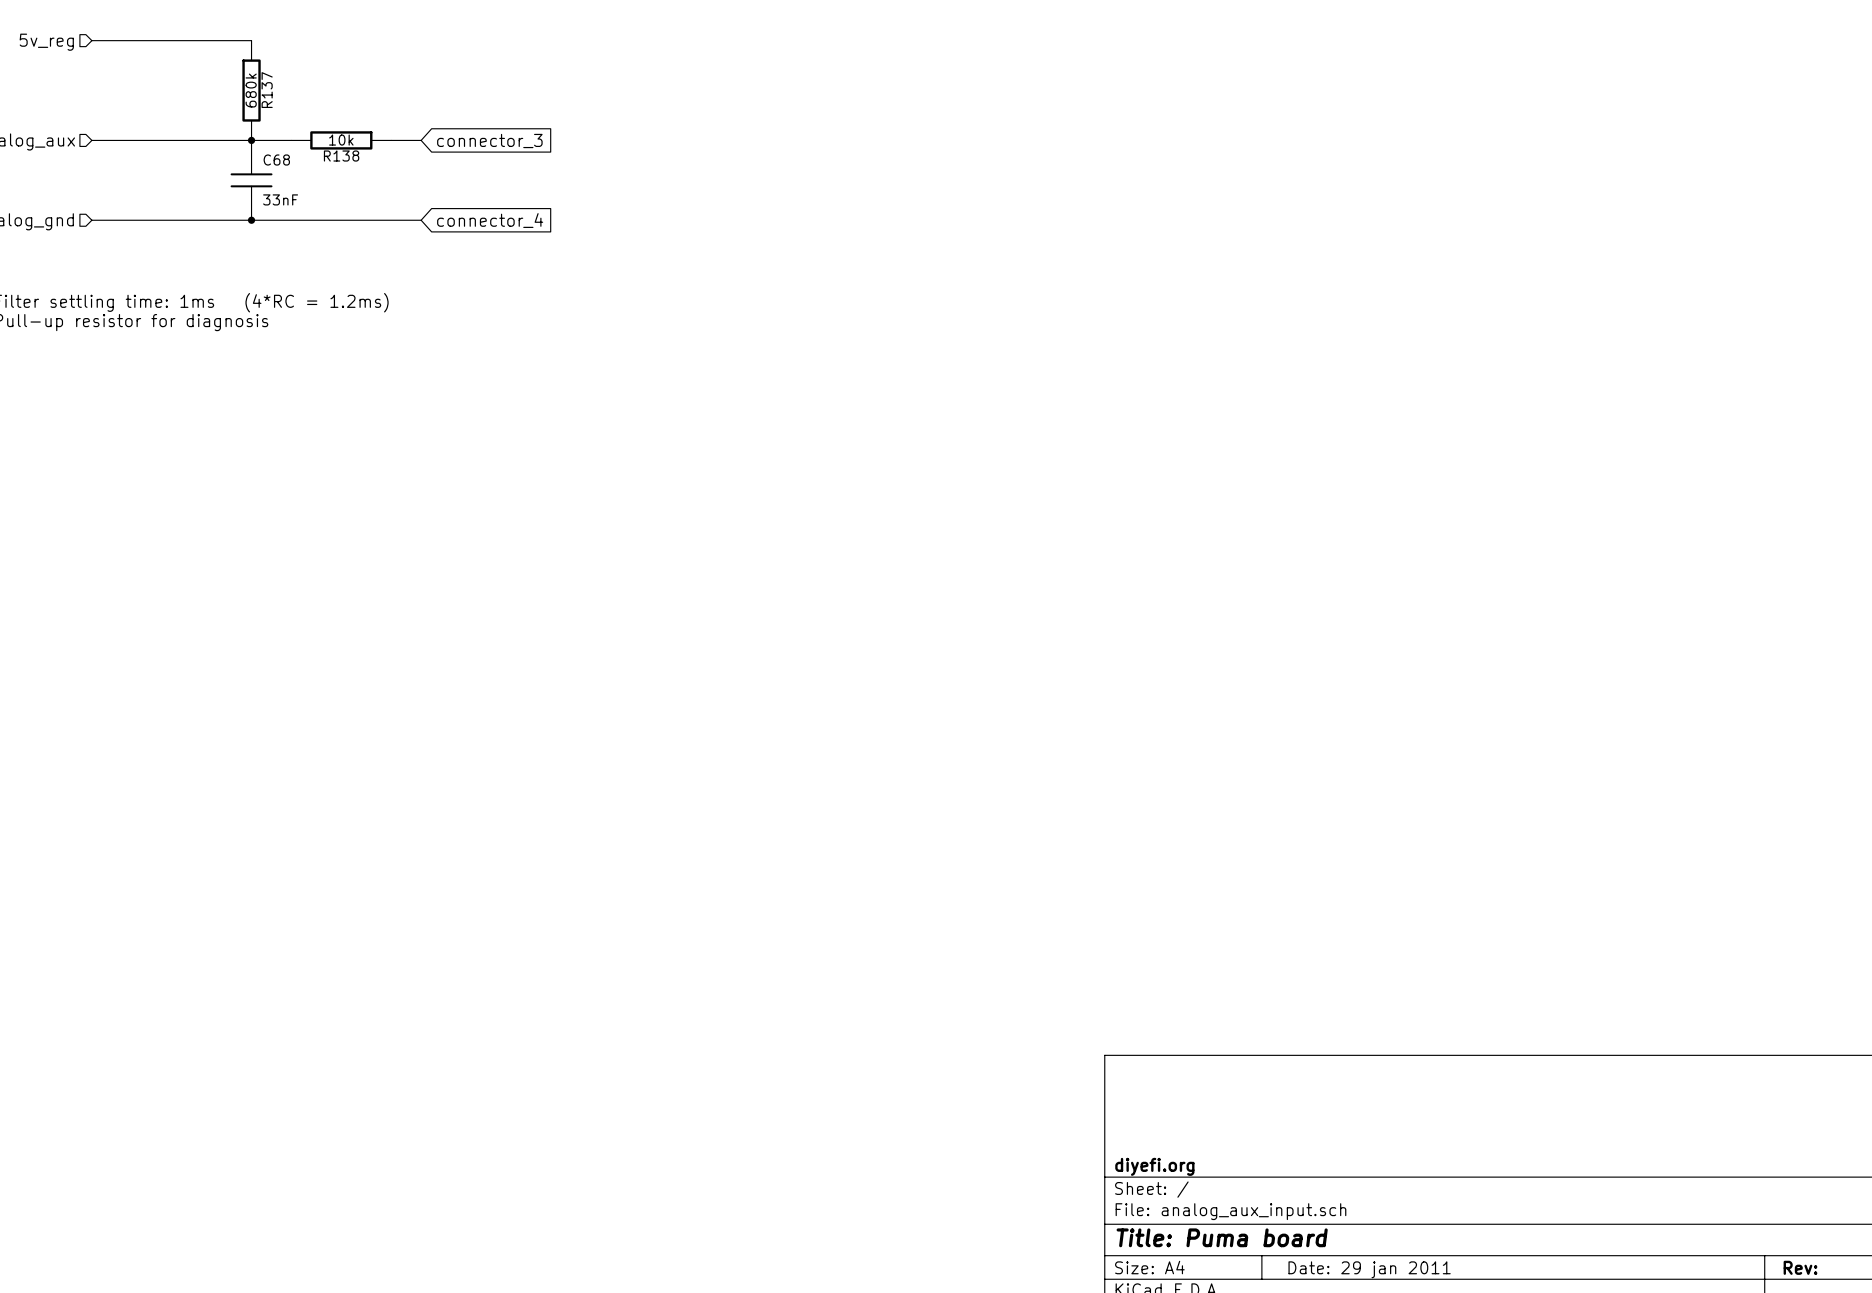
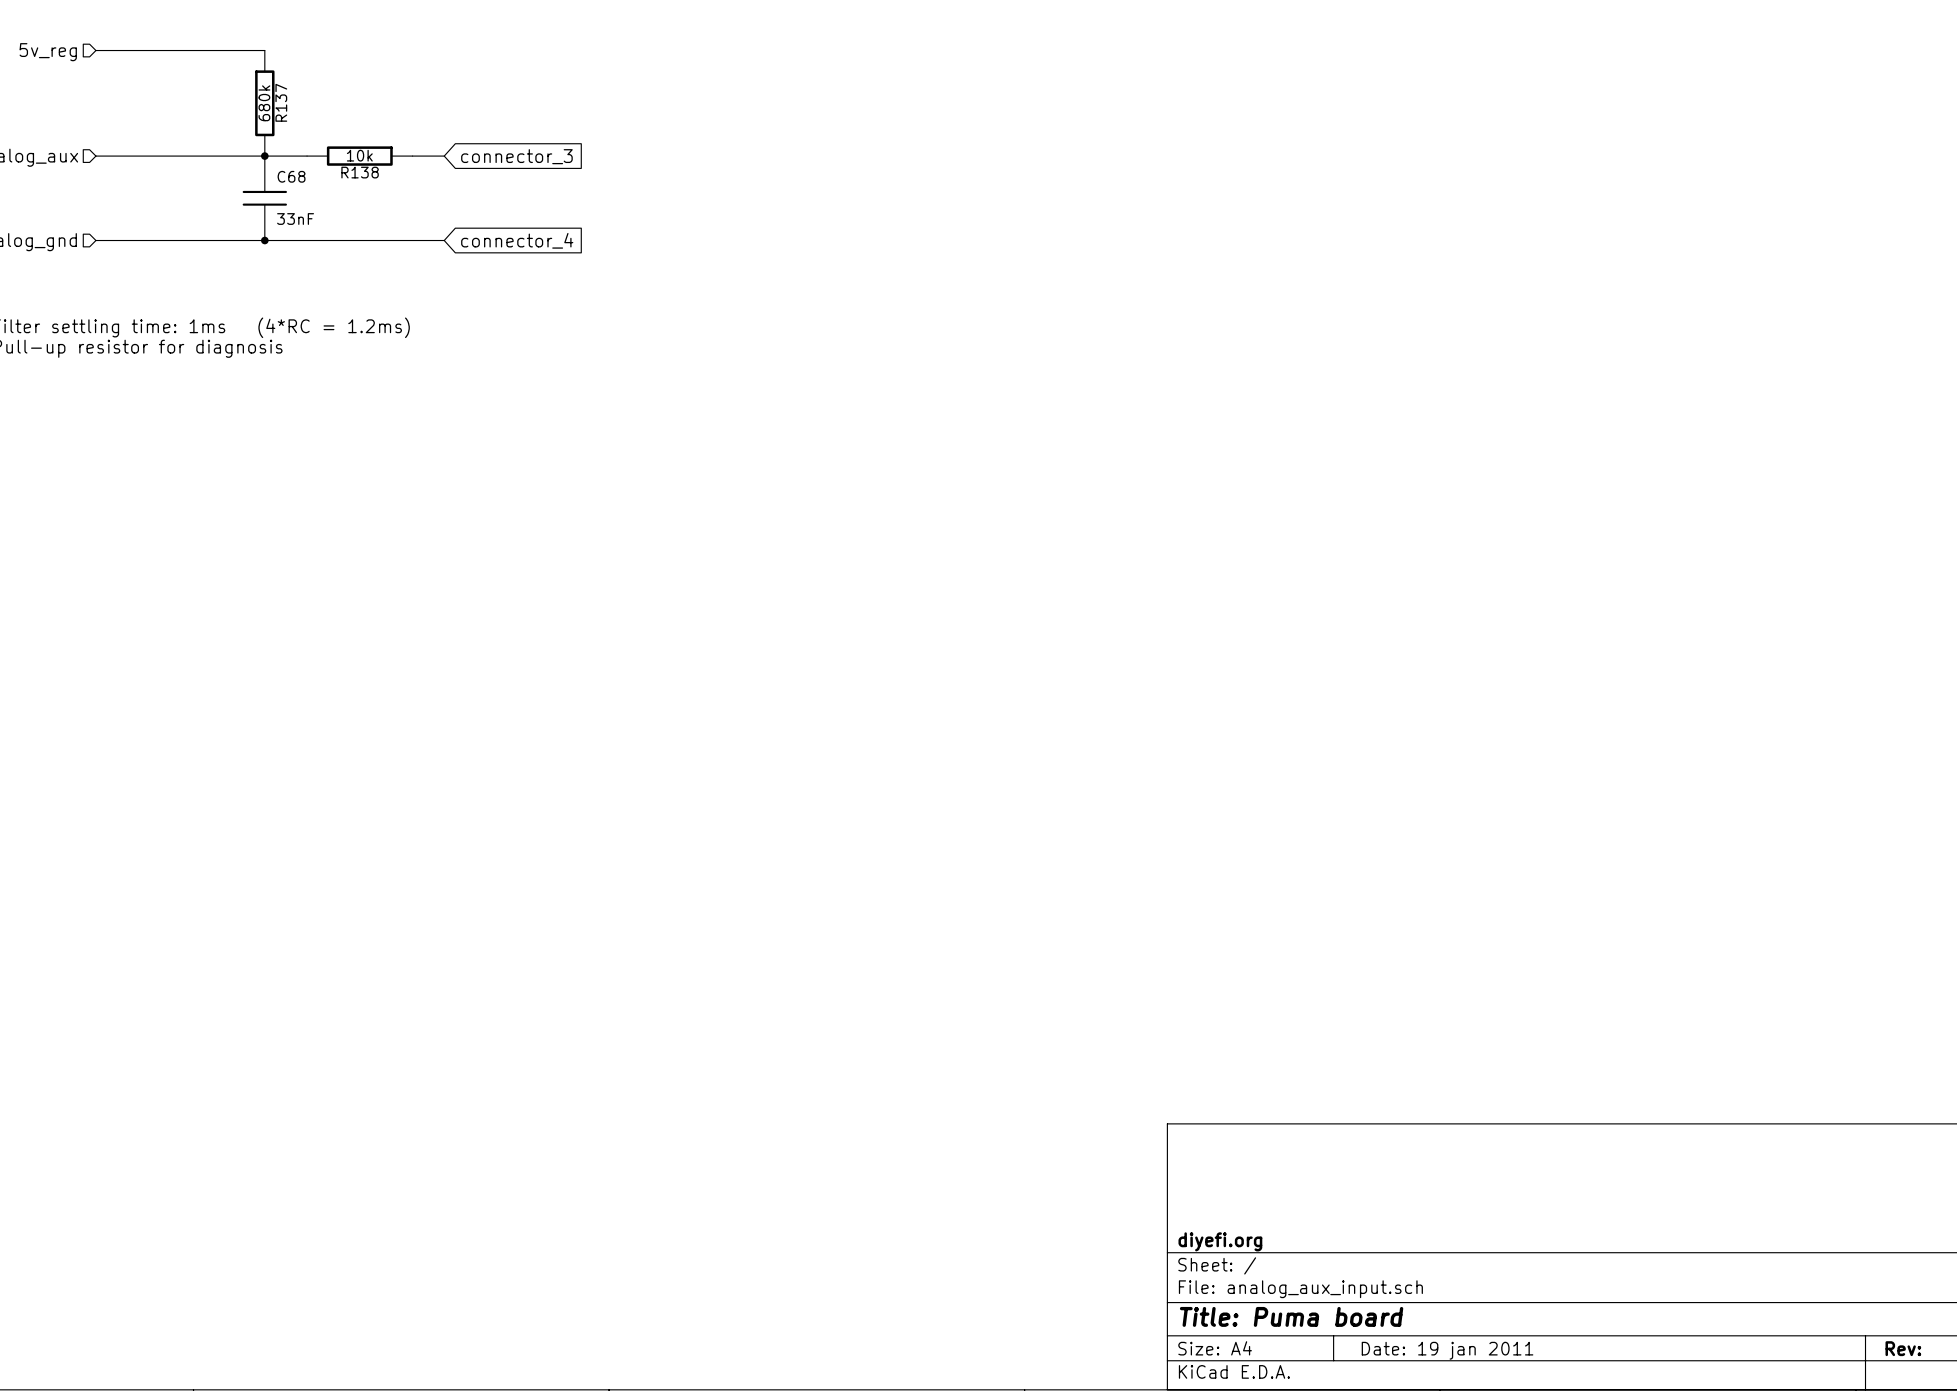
title block: Date: 29 jan 2011 (1369, 1269) -> Date: 19 jan 2011 (1447, 1350)

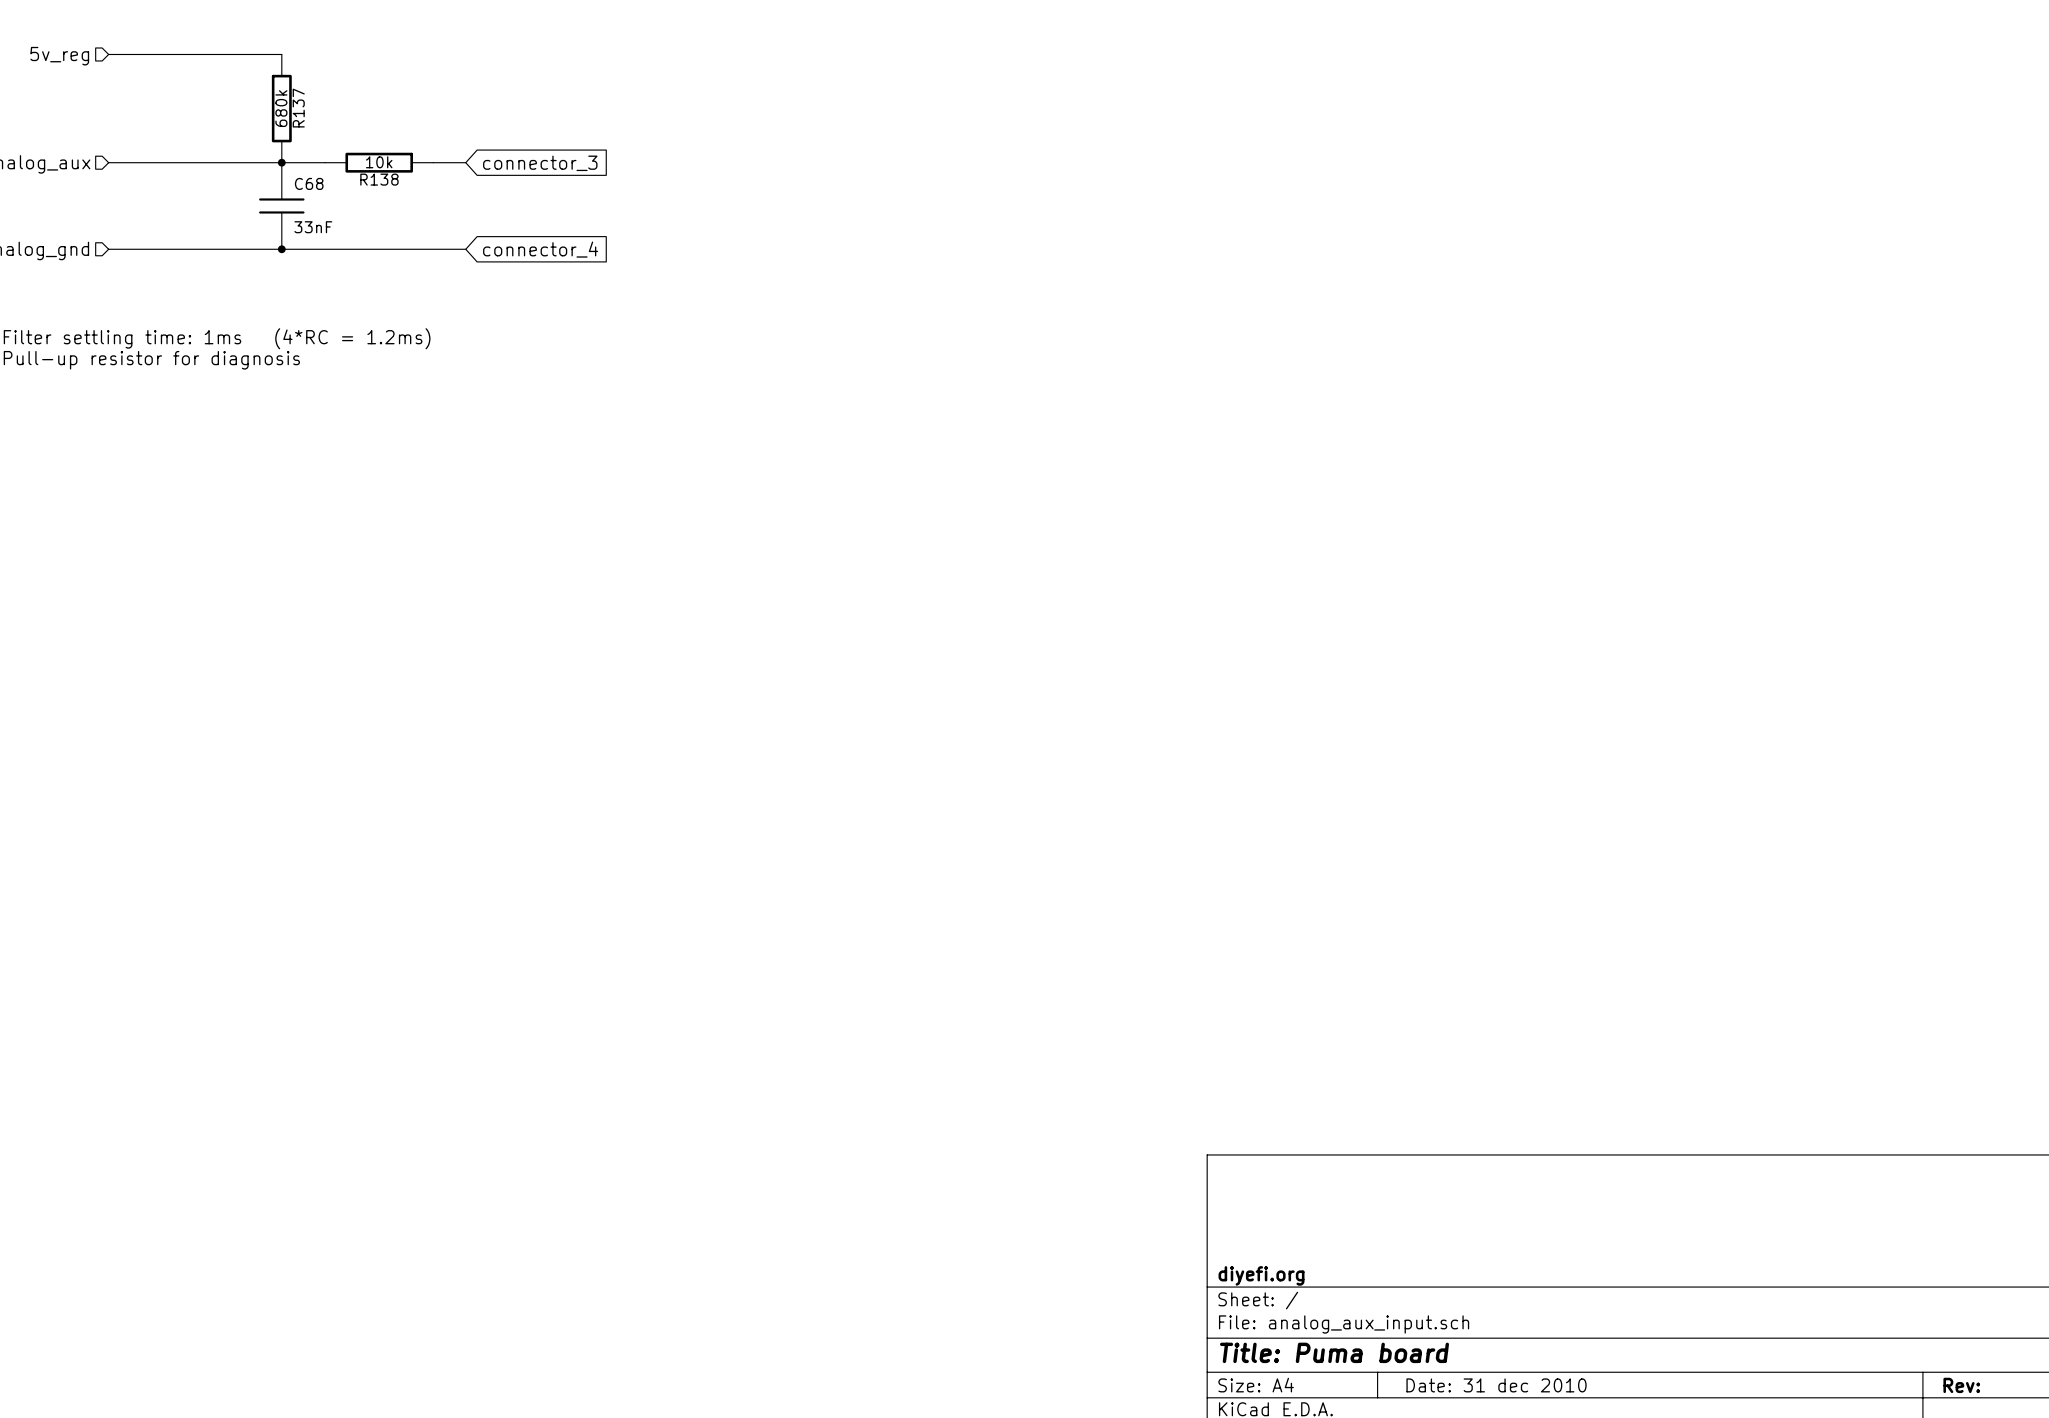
title block: Date: 19 jan 2011 (1447, 1350) -> Date: 31 dec 2010 (1496, 1385)

